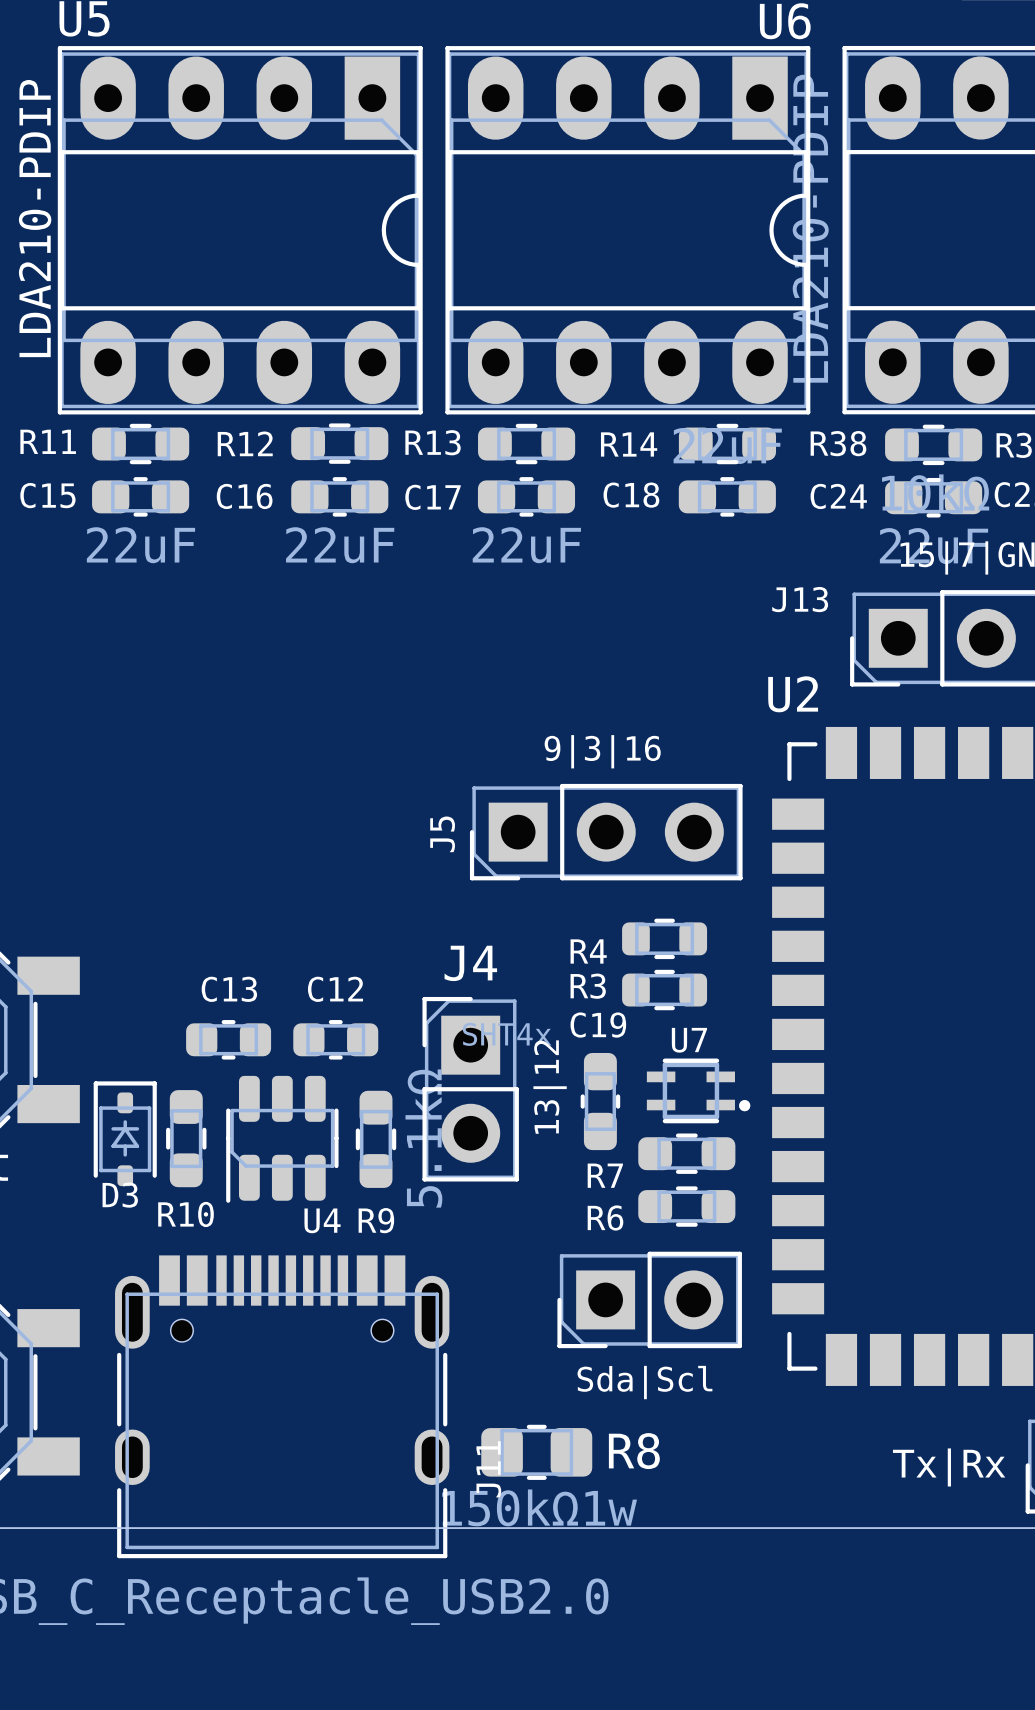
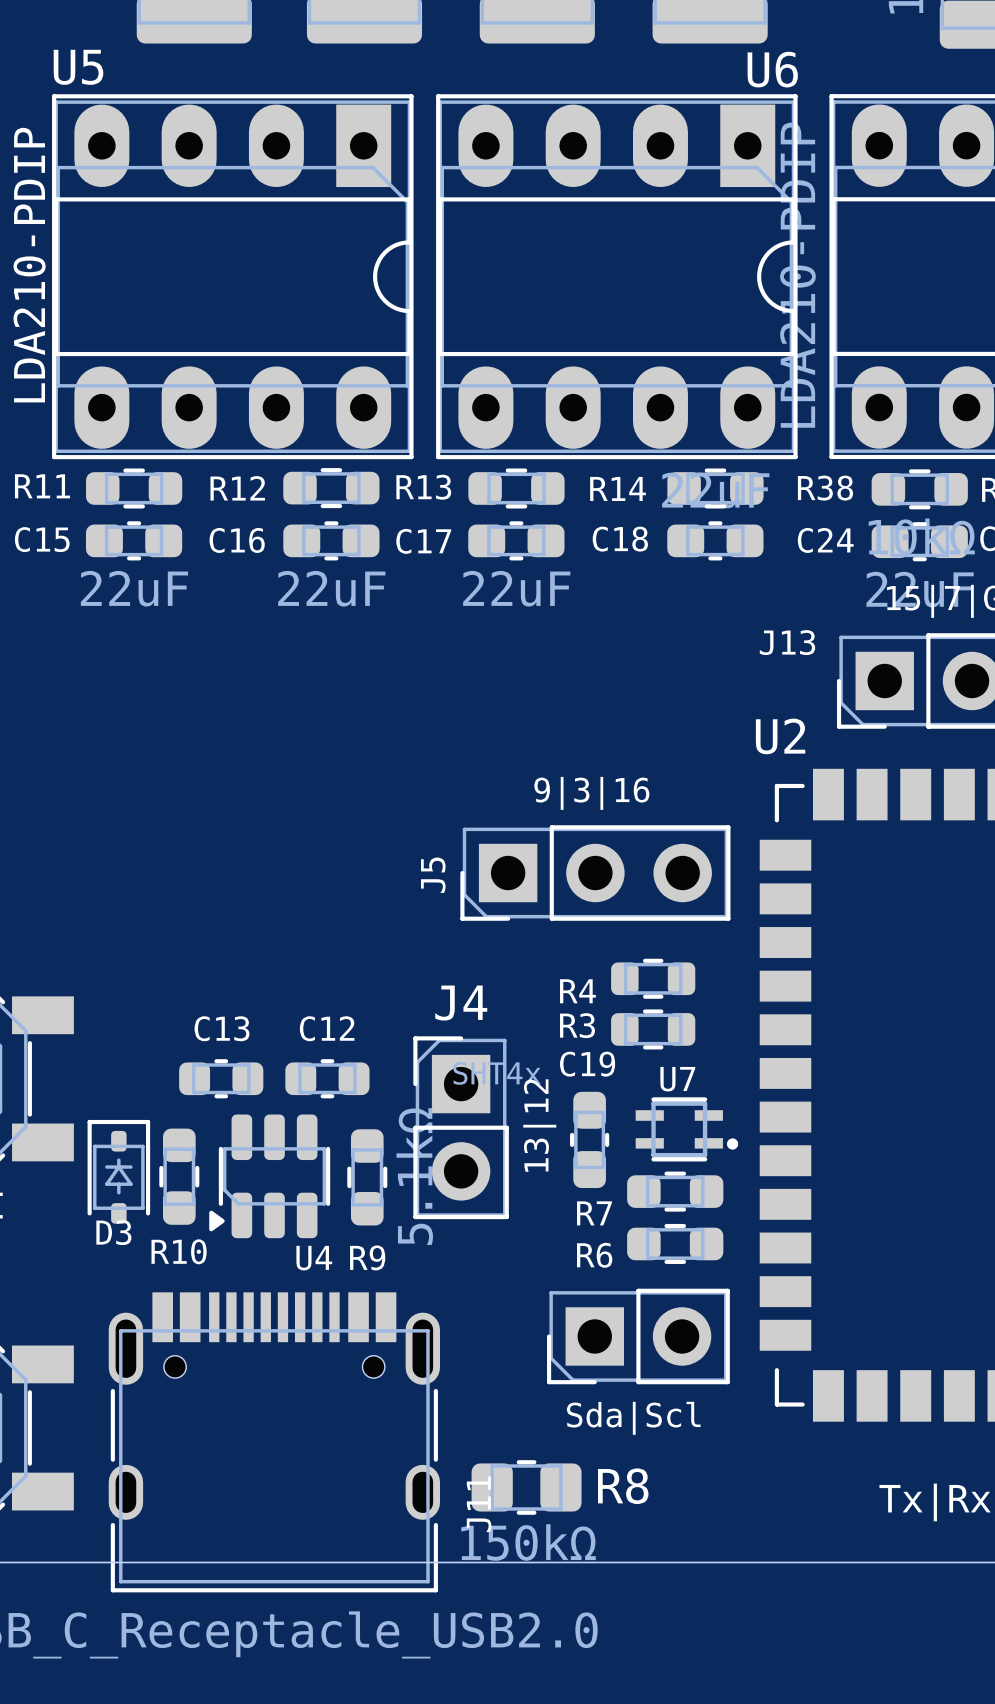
U4 footprint: [226, 1075, 339, 1203] -> [209, 1114, 331, 1239]
R8 value: 150kΩ1w (539, 1507) -> 150kΩ (528, 1542)

